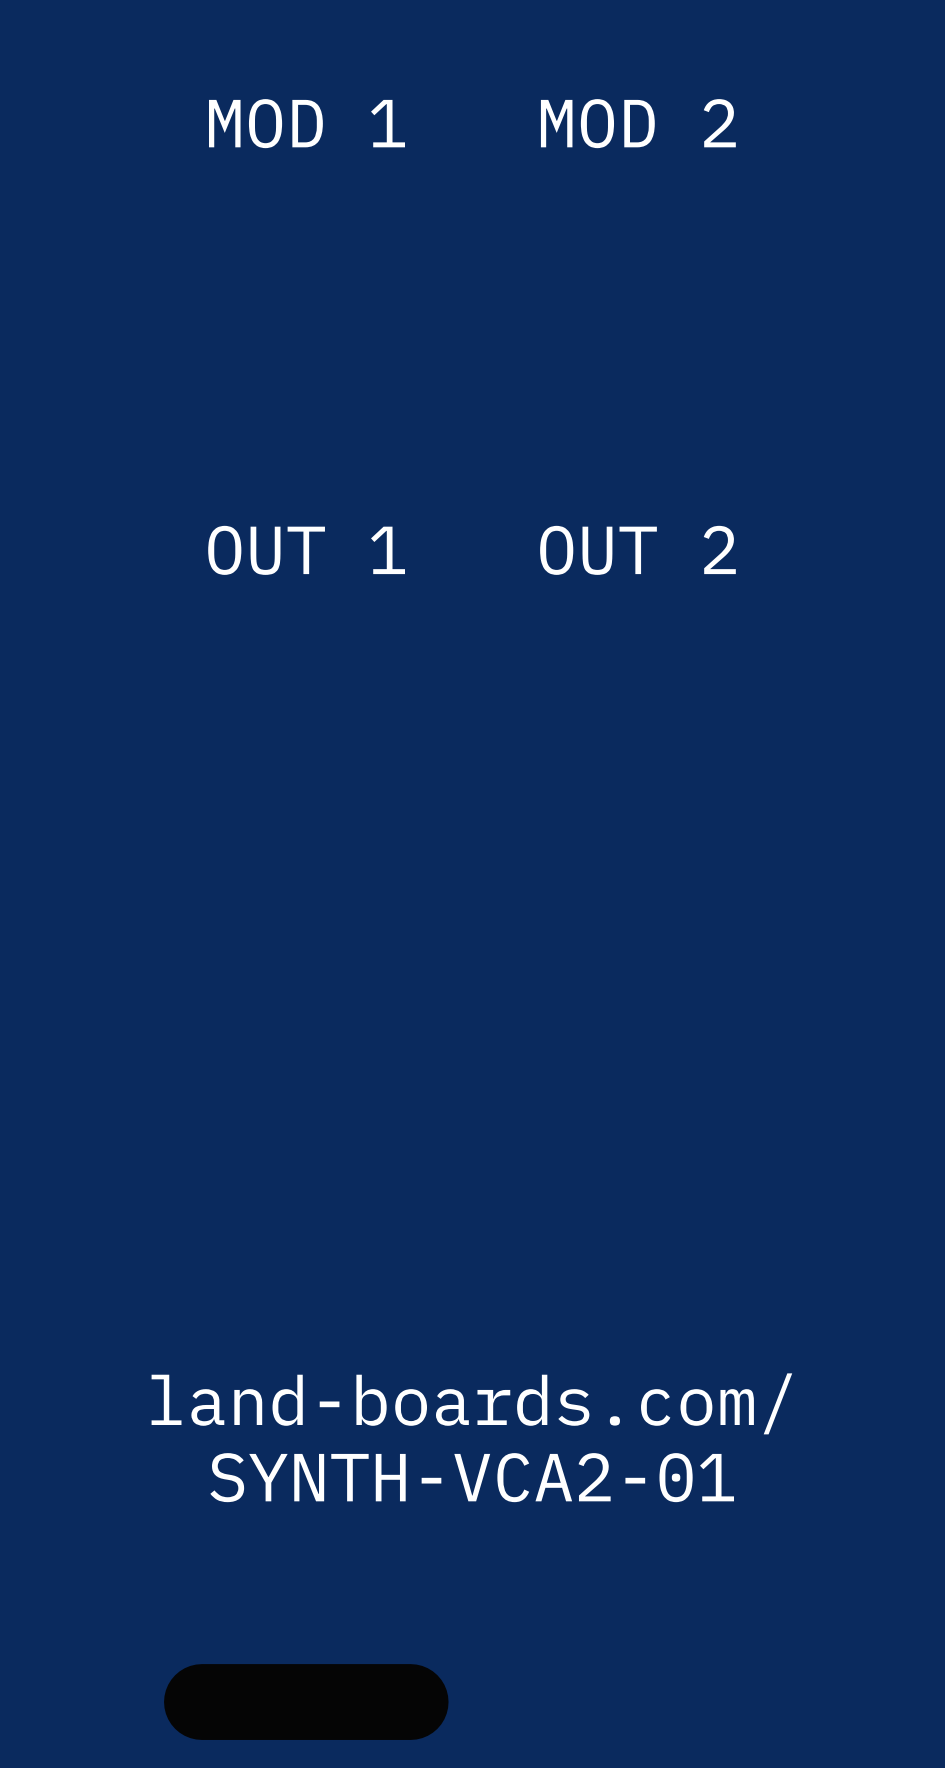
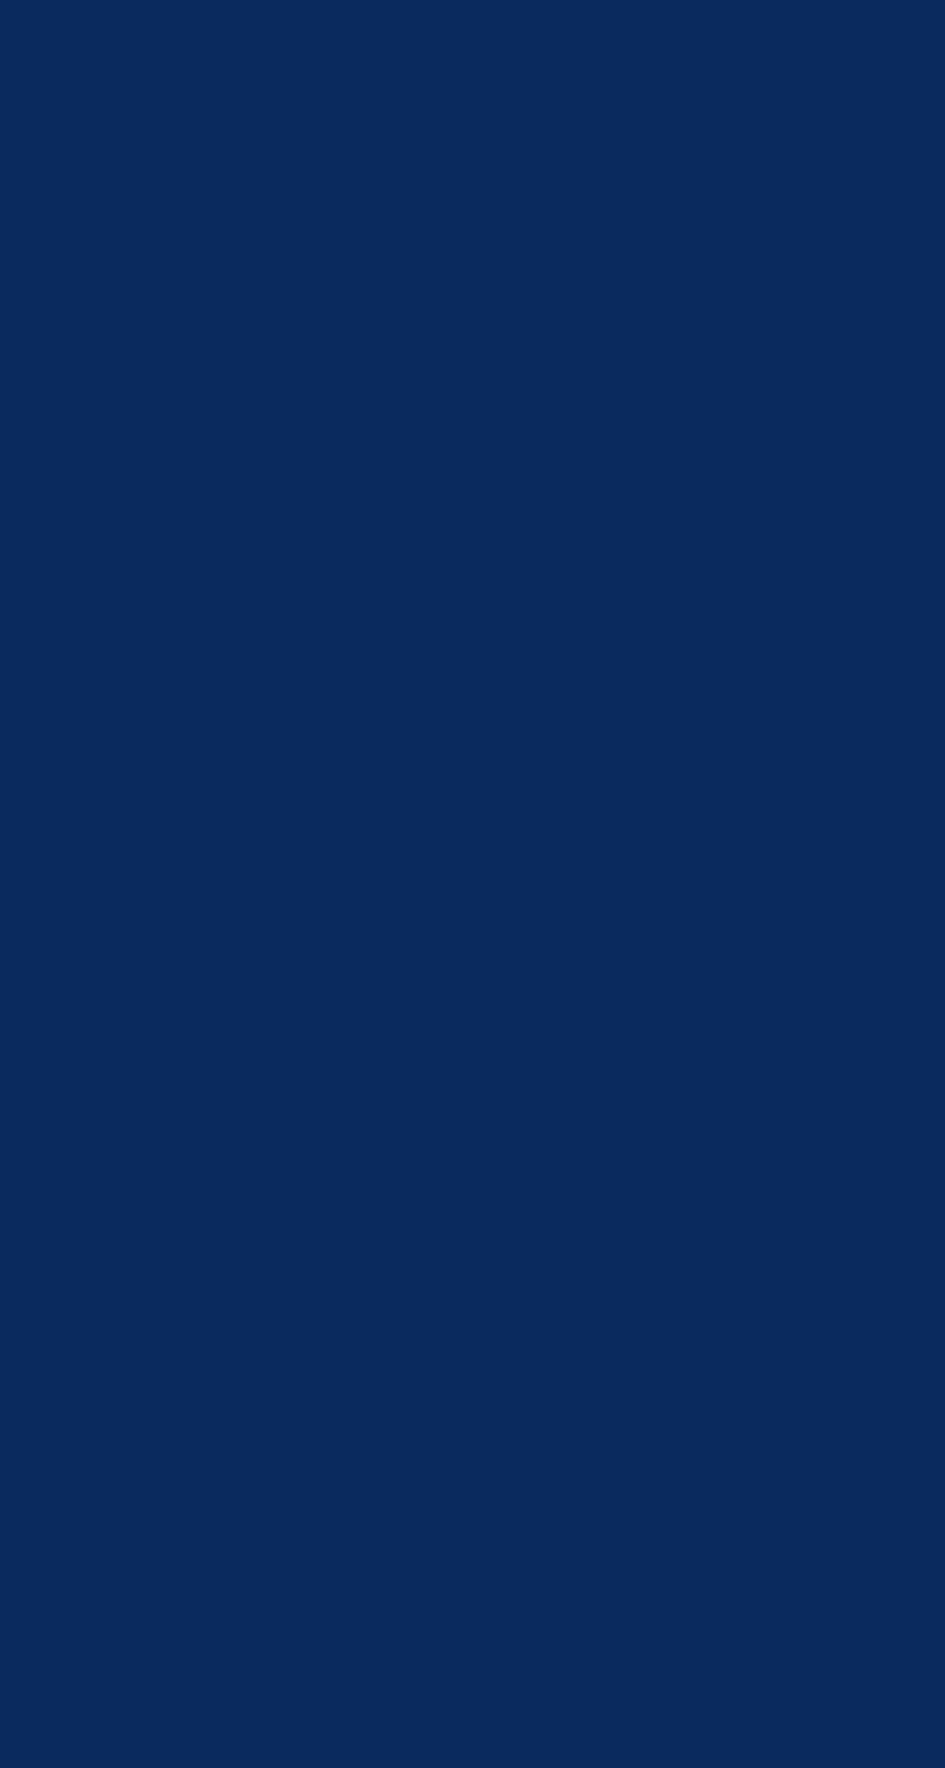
text: MOD 1 (307, 123) -> none
text: MOD 2 (638, 123) -> none
text: OUT 1 (306, 550) -> none
text: OUT 2 (637, 550) -> none
text: land-boards.com/ (471, 1403) -> none
text: SYNTH-VCA2-01 (472, 1477) -> none
part: (306, 1702) -> none

